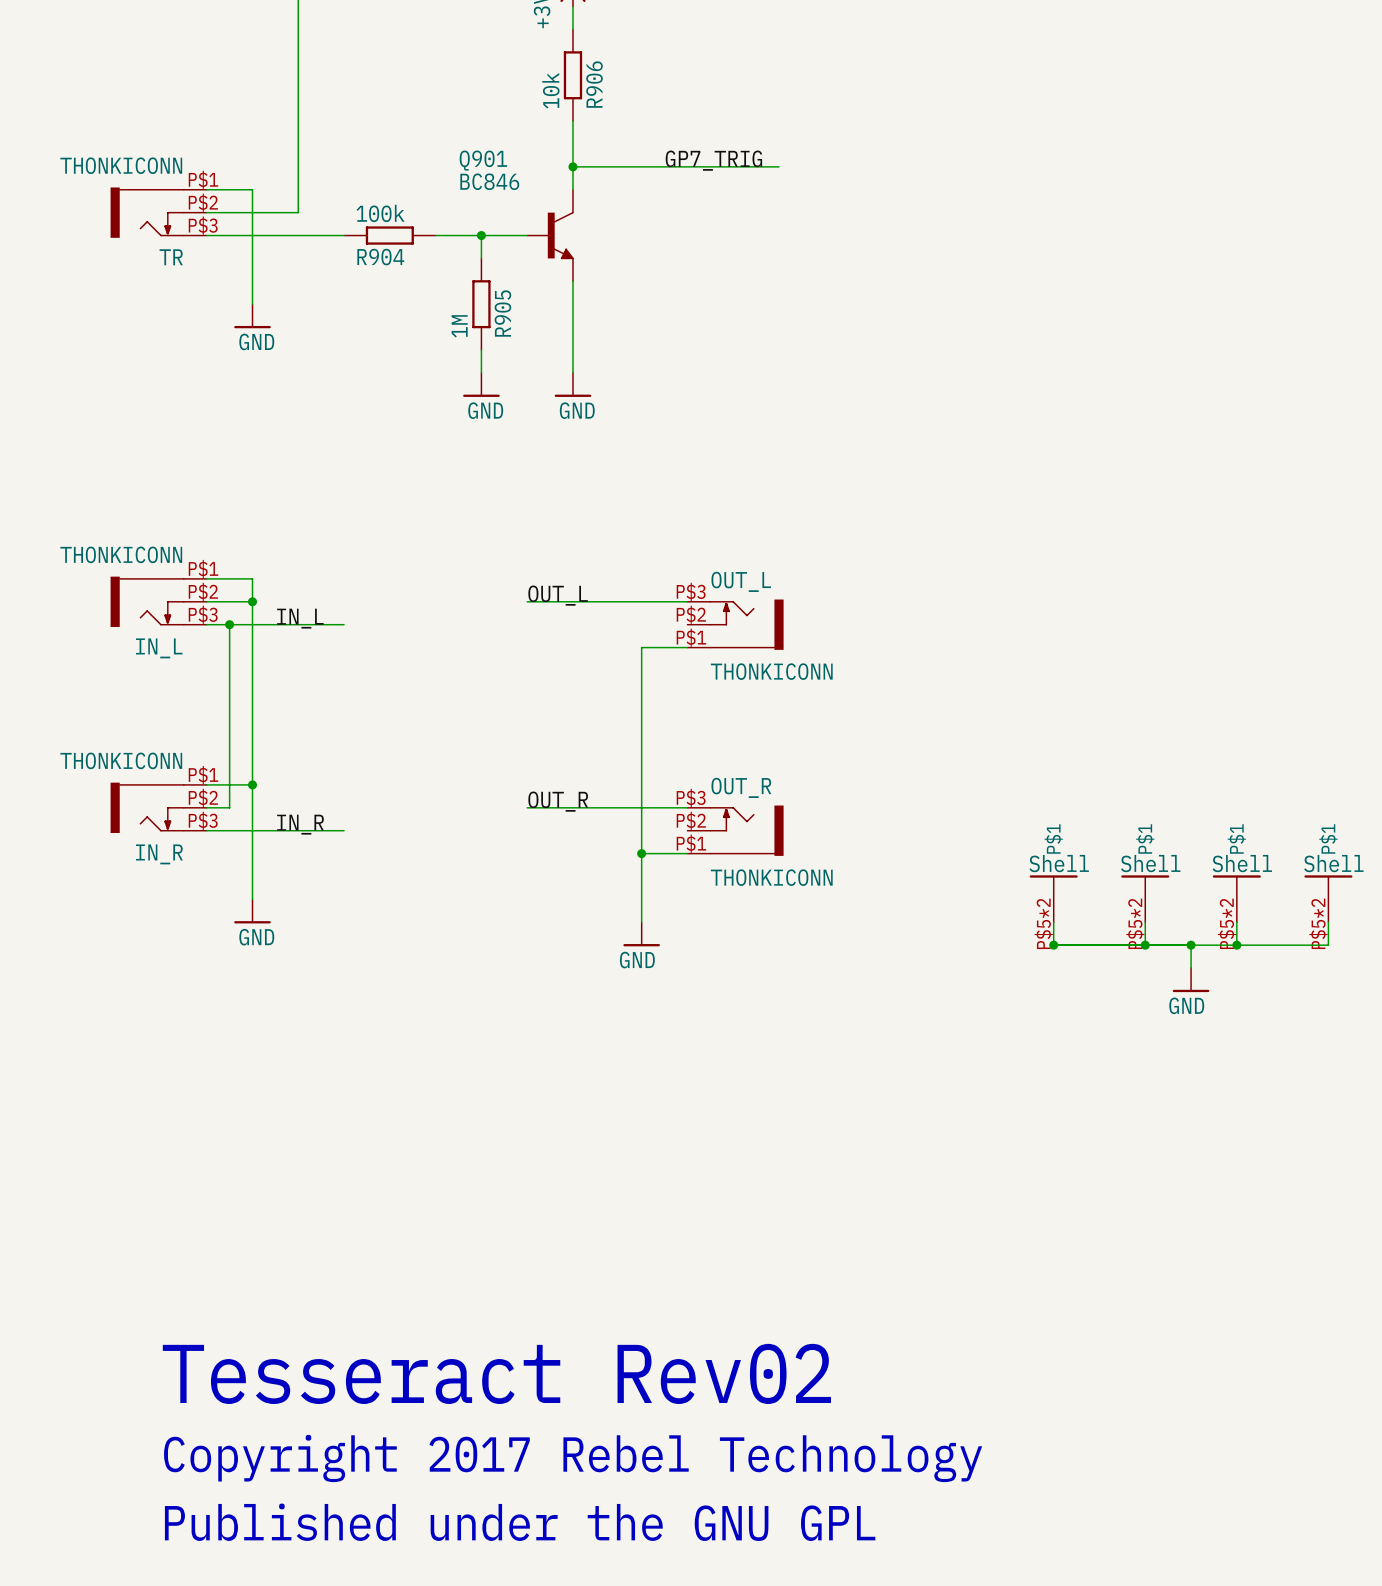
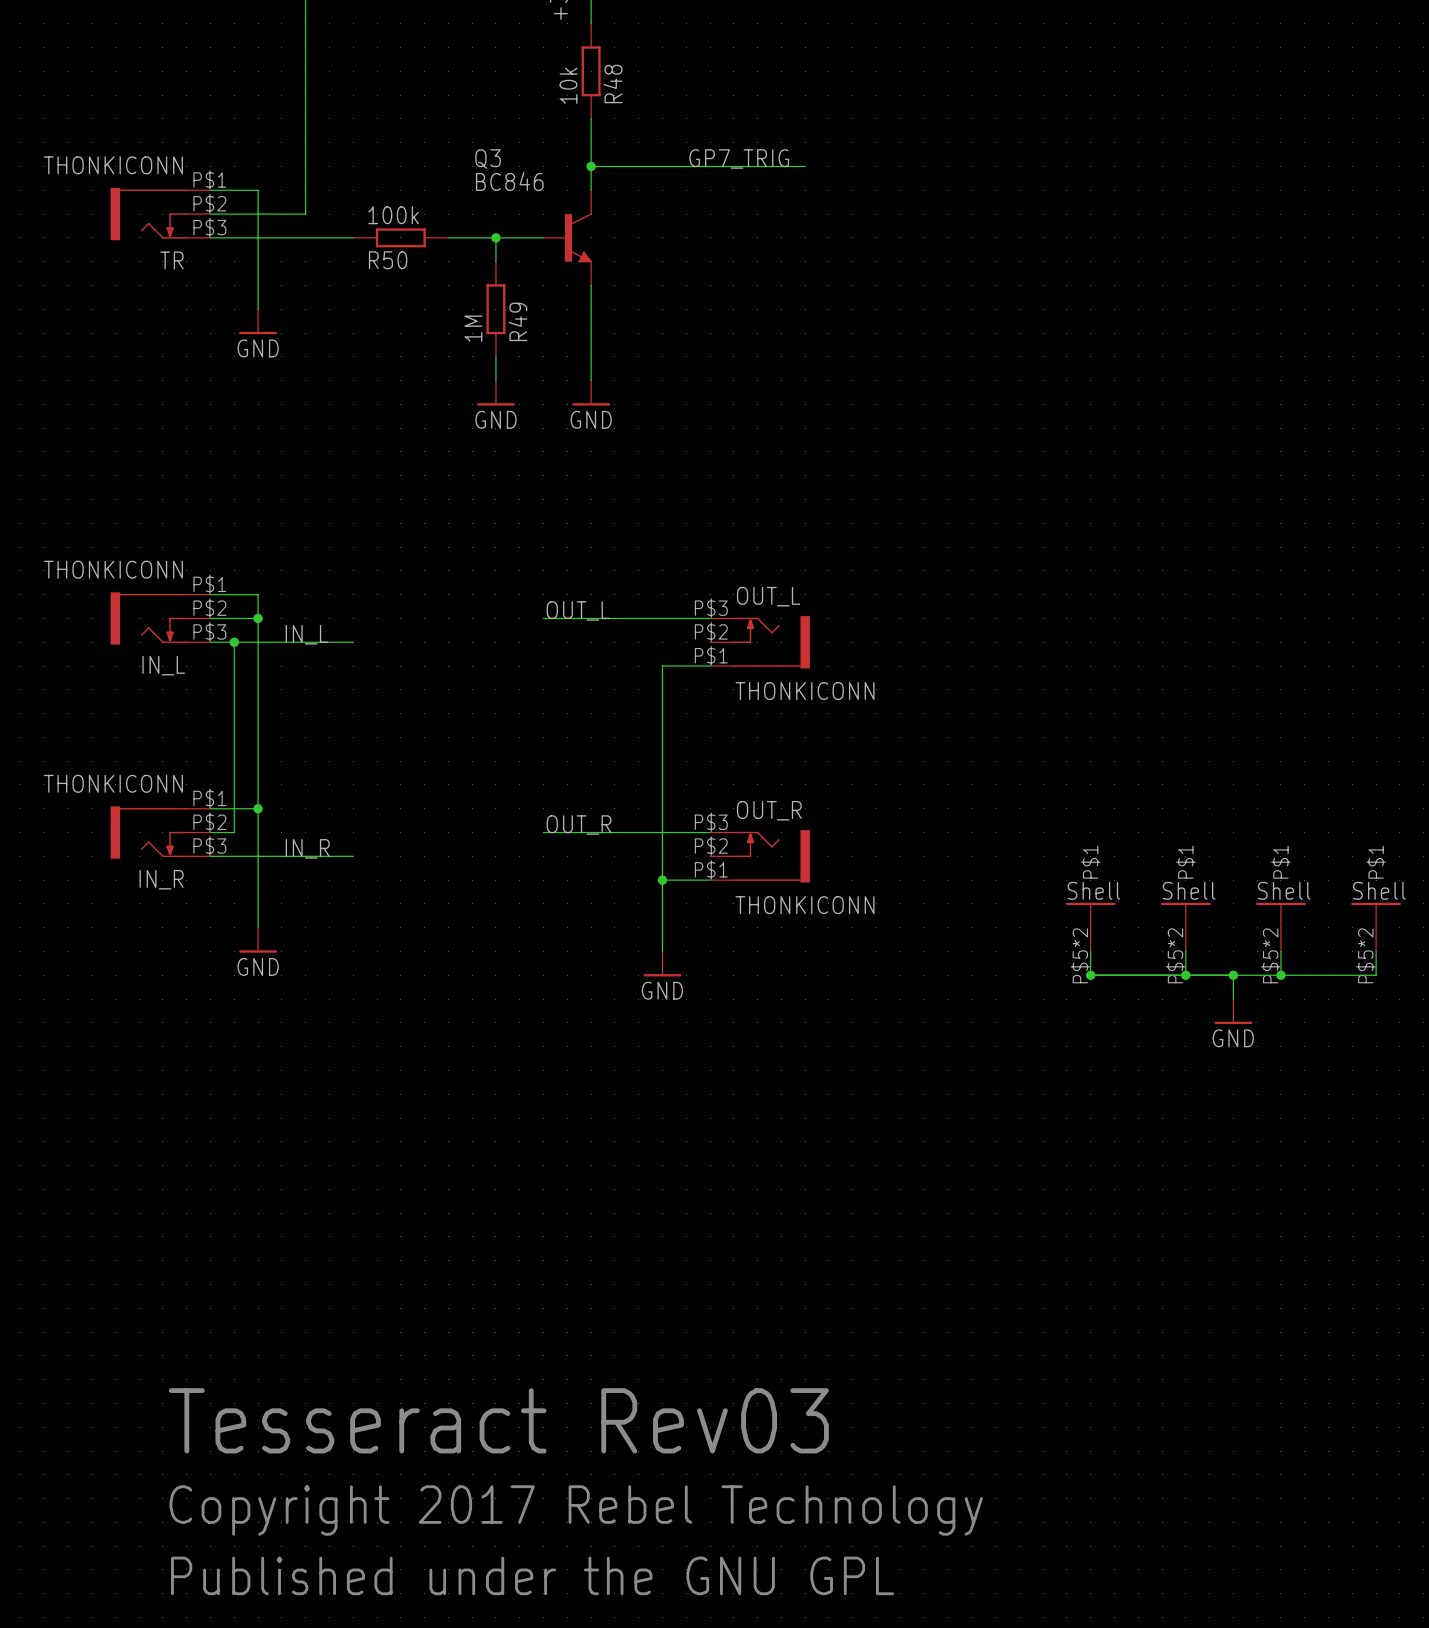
R906 name: R906 (594, 84) -> R48 (613, 84)
Q901 name: Q901 (483, 160) -> Q3 (488, 158)
R904 name: R904 (380, 257) -> R50 (388, 260)
R905 name: R905 (502, 313) -> R49 (517, 321)
text: Tesseract Rev02 (496, 1373) -> Tesseract Rev03 (498, 1420)

